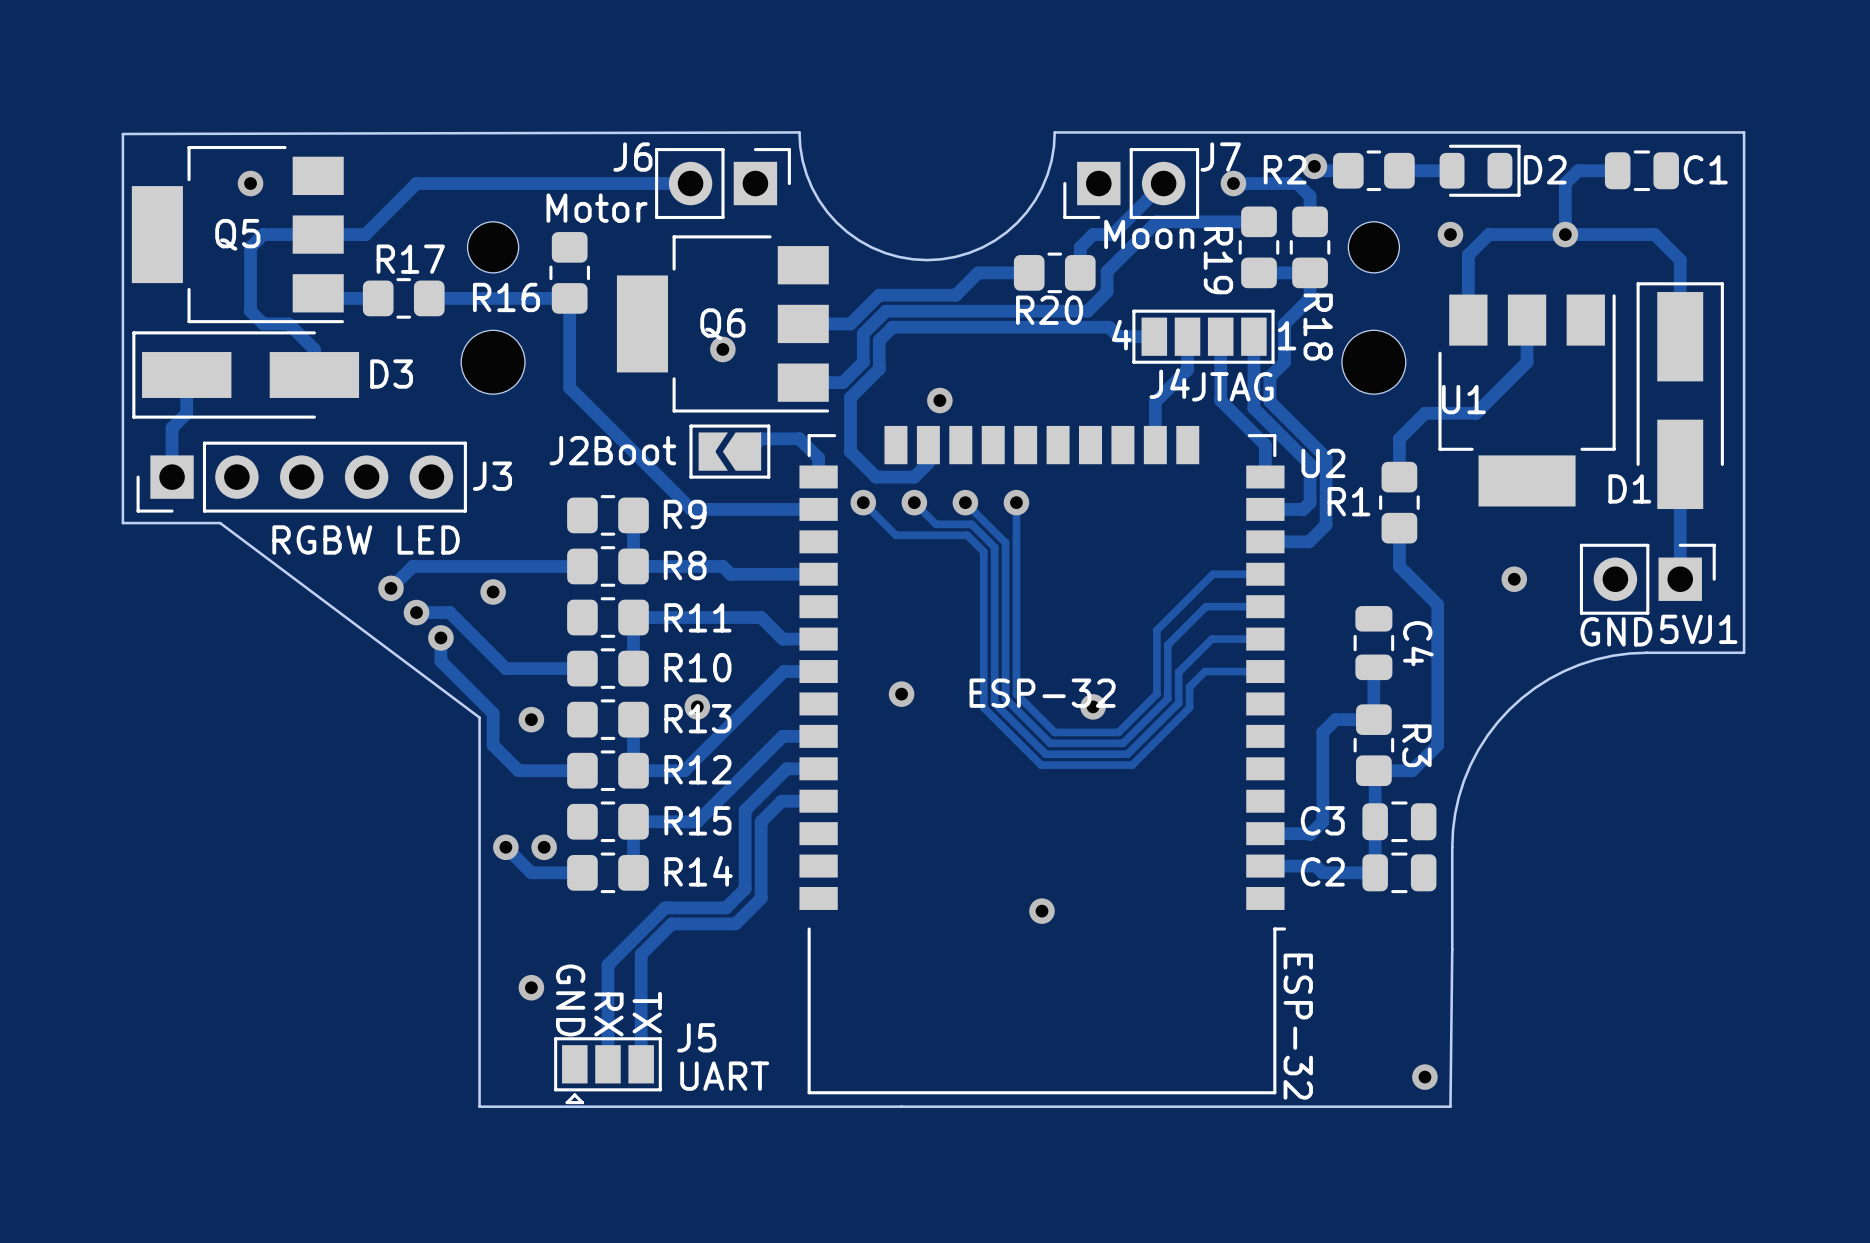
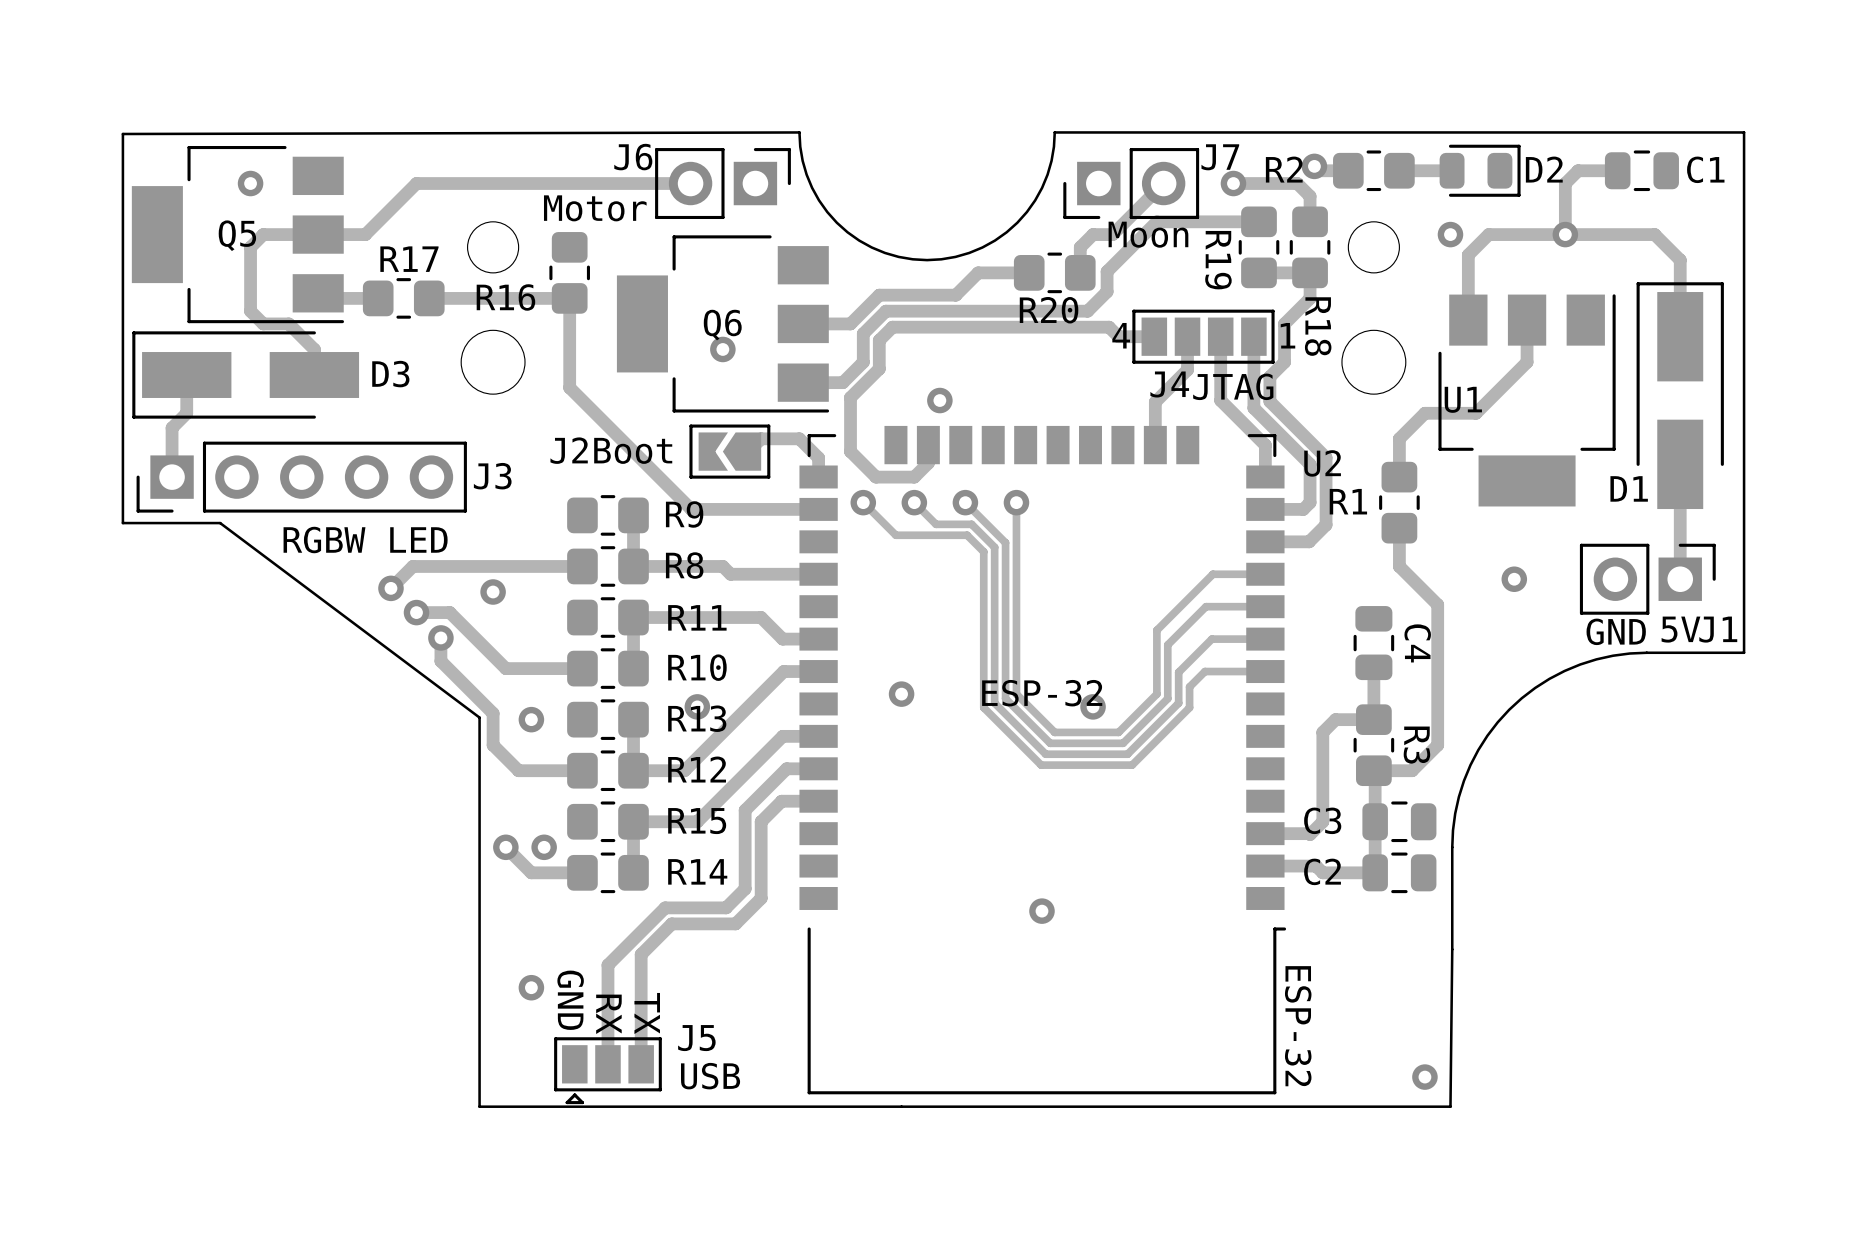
J5 text: none -> USB (710, 1076)
J5 text: UART (724, 1076) -> none

